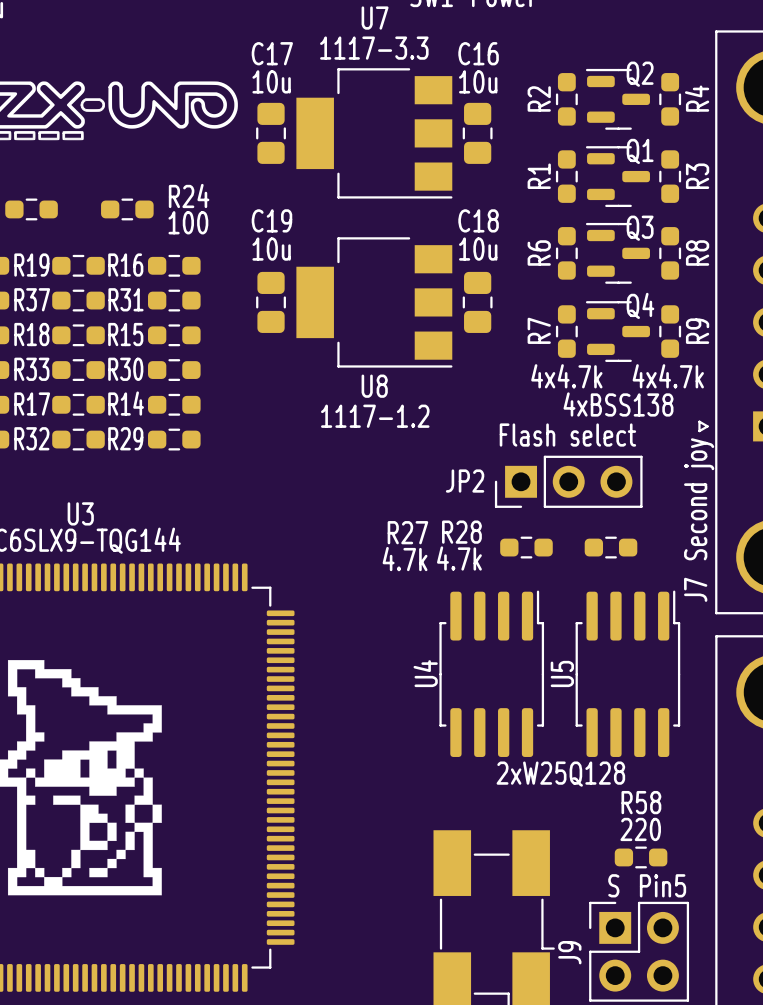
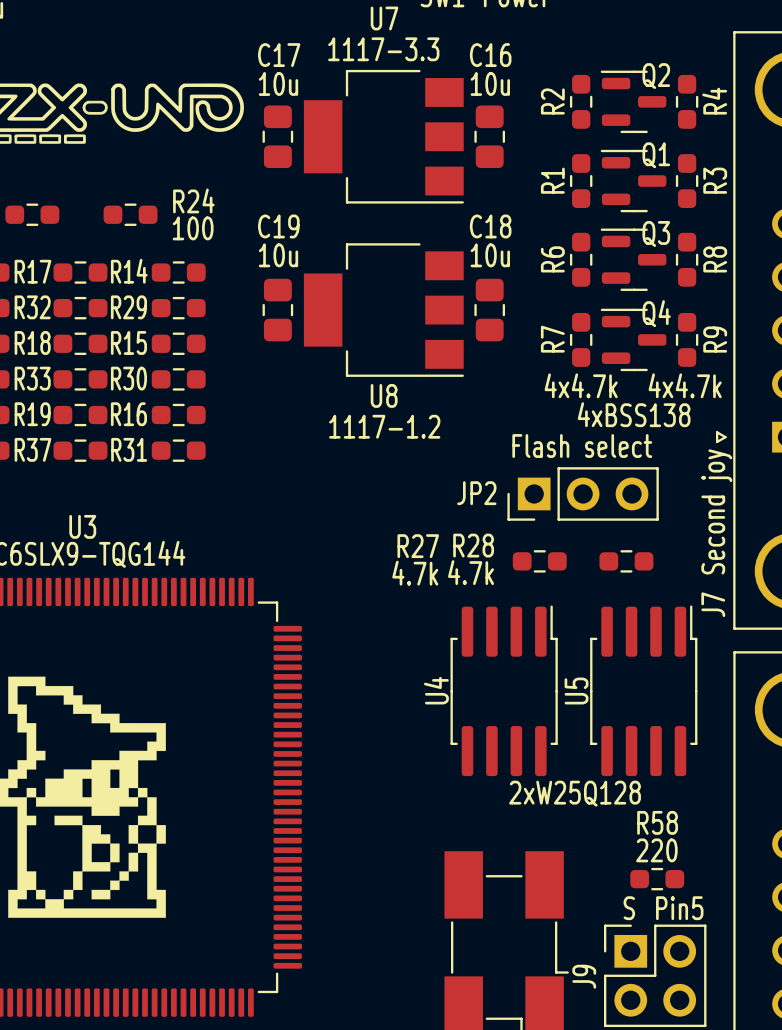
R19 name: R19 (31, 265) -> R17 (32, 271)
R16 name: R16 (125, 265) -> R14 (129, 271)
R37 name: R37 (32, 299) -> R32 (32, 307)
R31 name: R31 (126, 299) -> R29 (128, 307)
R14 name: R14 (126, 403) -> R16 (128, 414)
R17 name: R17 (32, 404) -> R19 (32, 414)
R32 name: R32 (31, 438) -> R37 (32, 449)
R29 name: R29 (125, 438) -> R31 (129, 449)

